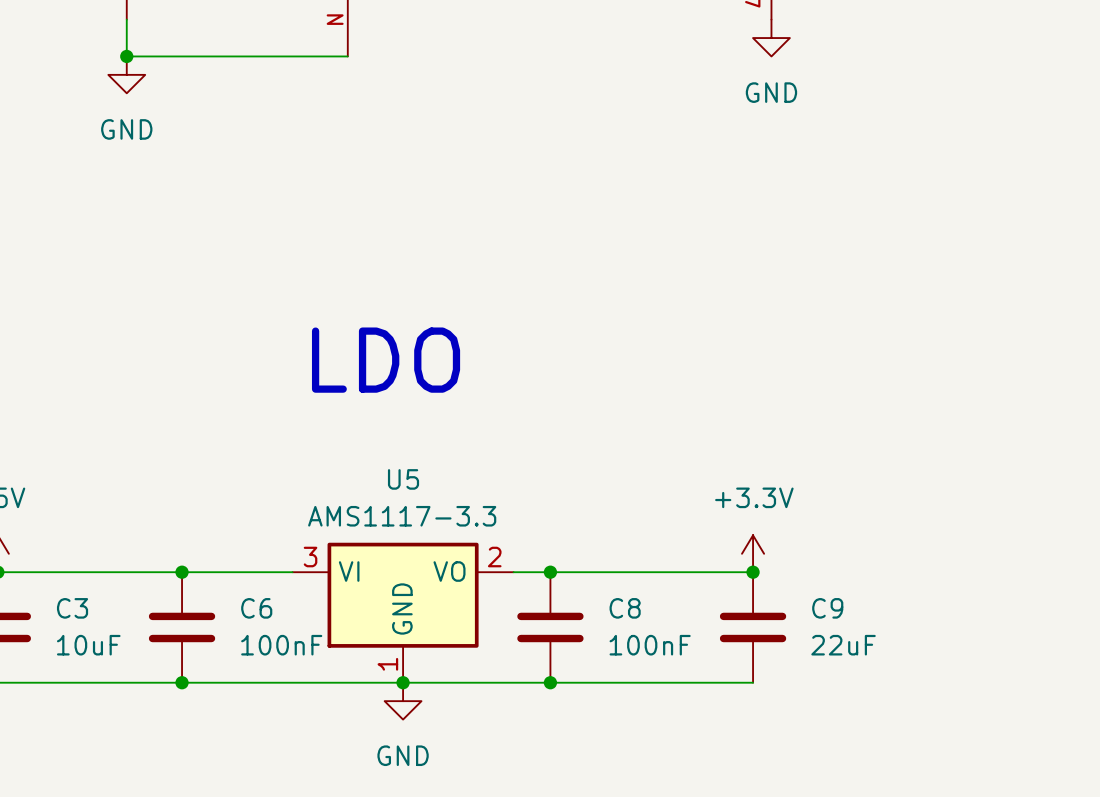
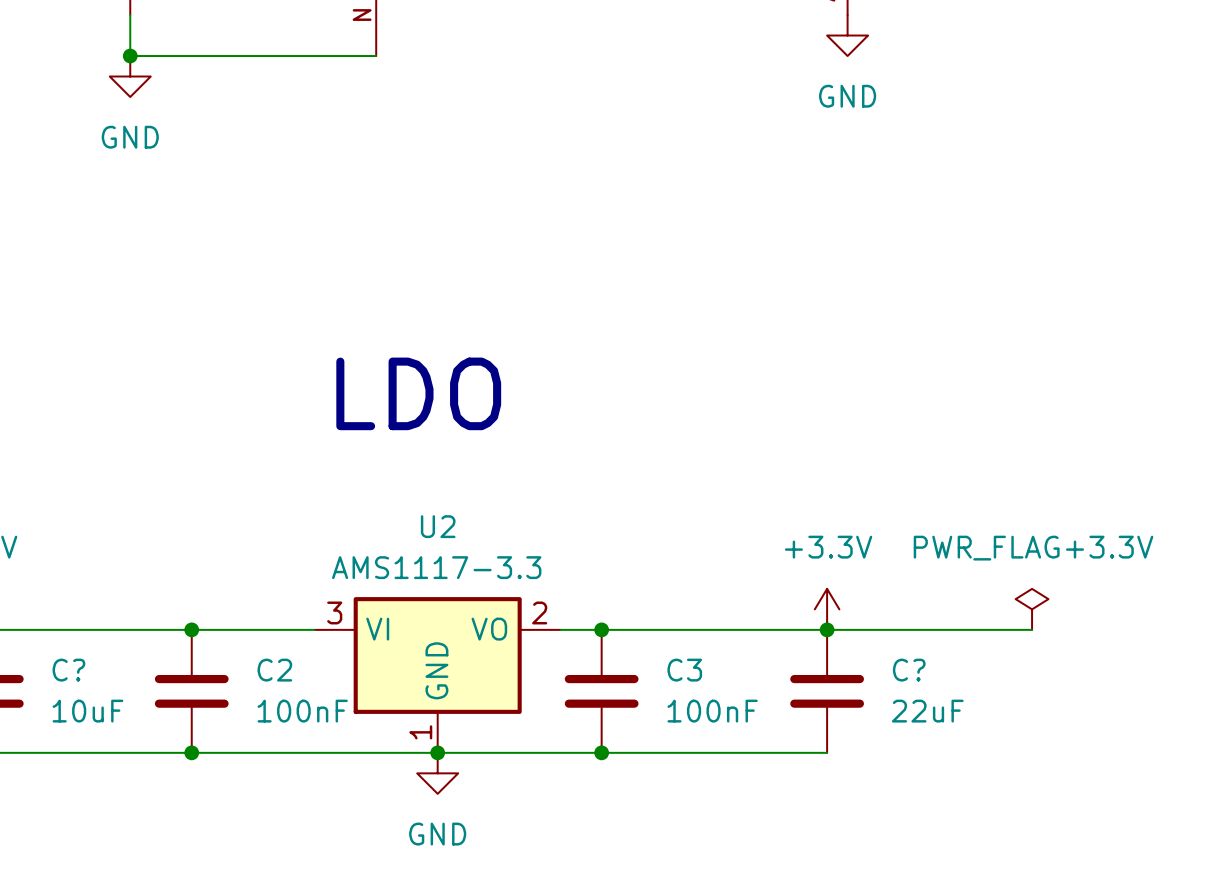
U5 name: U5 (403, 479) -> U2 (438, 526)
power symbol: none -> PWR_FLAG+3.3V (1032, 609)
wire: none -> (827, 629) (1032, 629)
C3 name: C3 (72, 608) -> C? (68, 670)
C6 name: C6 (256, 608) -> C2 (274, 670)
C8 name: C8 (625, 608) -> C3 (684, 670)
C9 name: C9 (827, 608) -> C? (909, 670)

